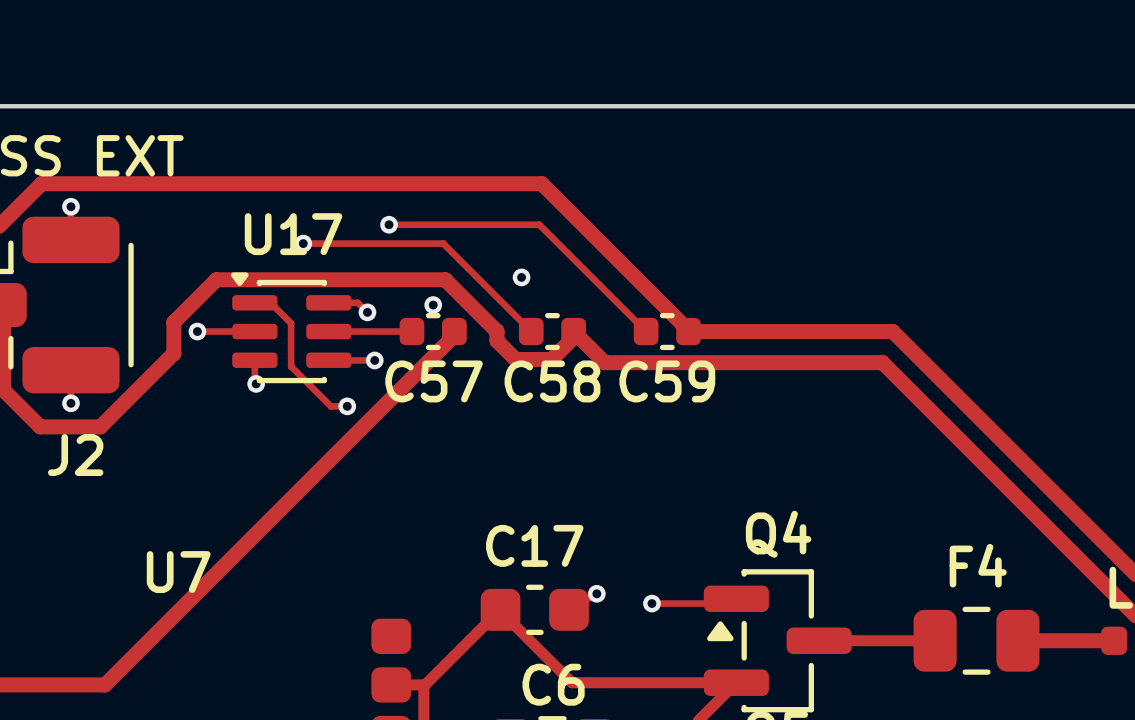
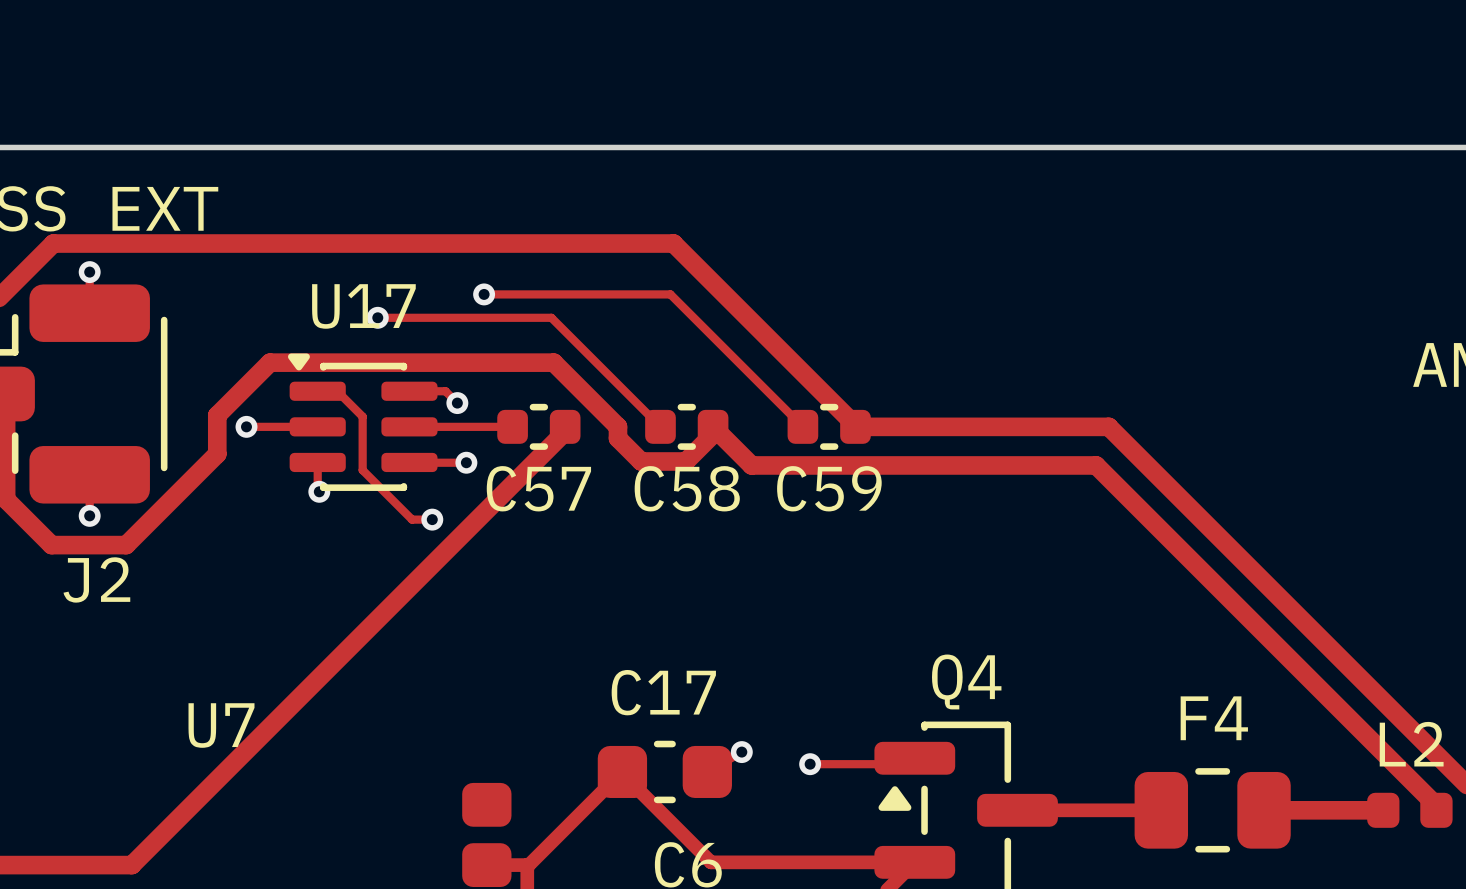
via: (521, 277) -> none
via: (433, 305) -> none

